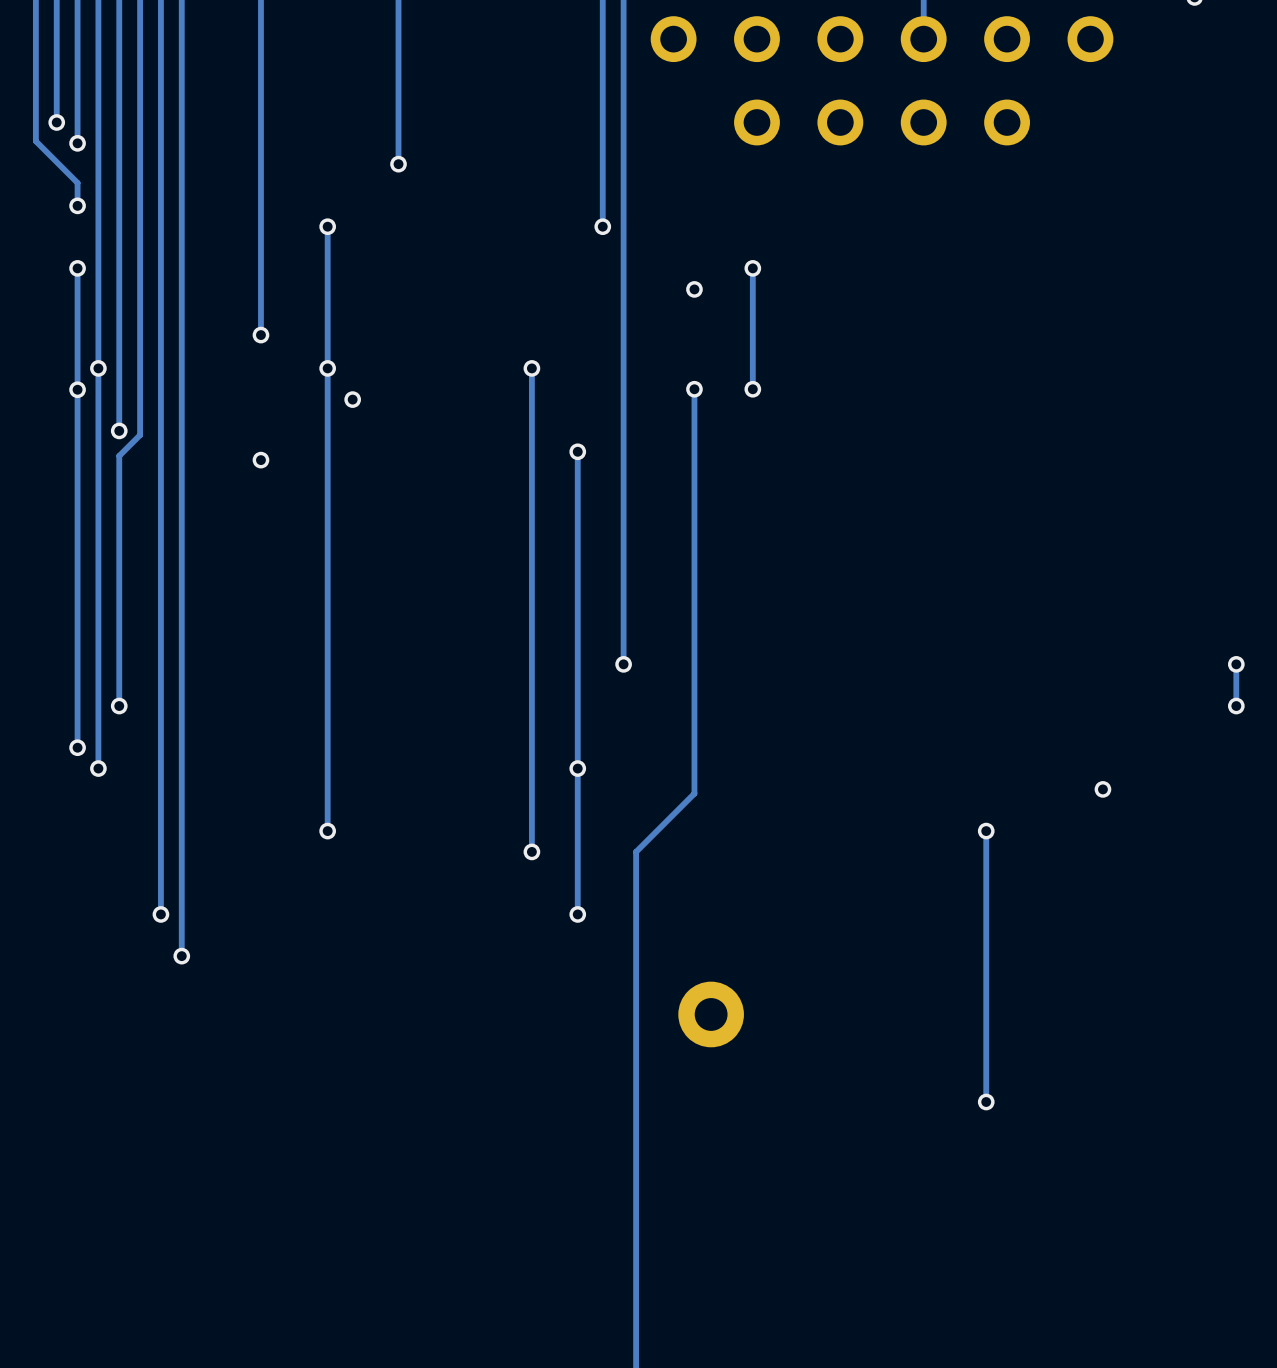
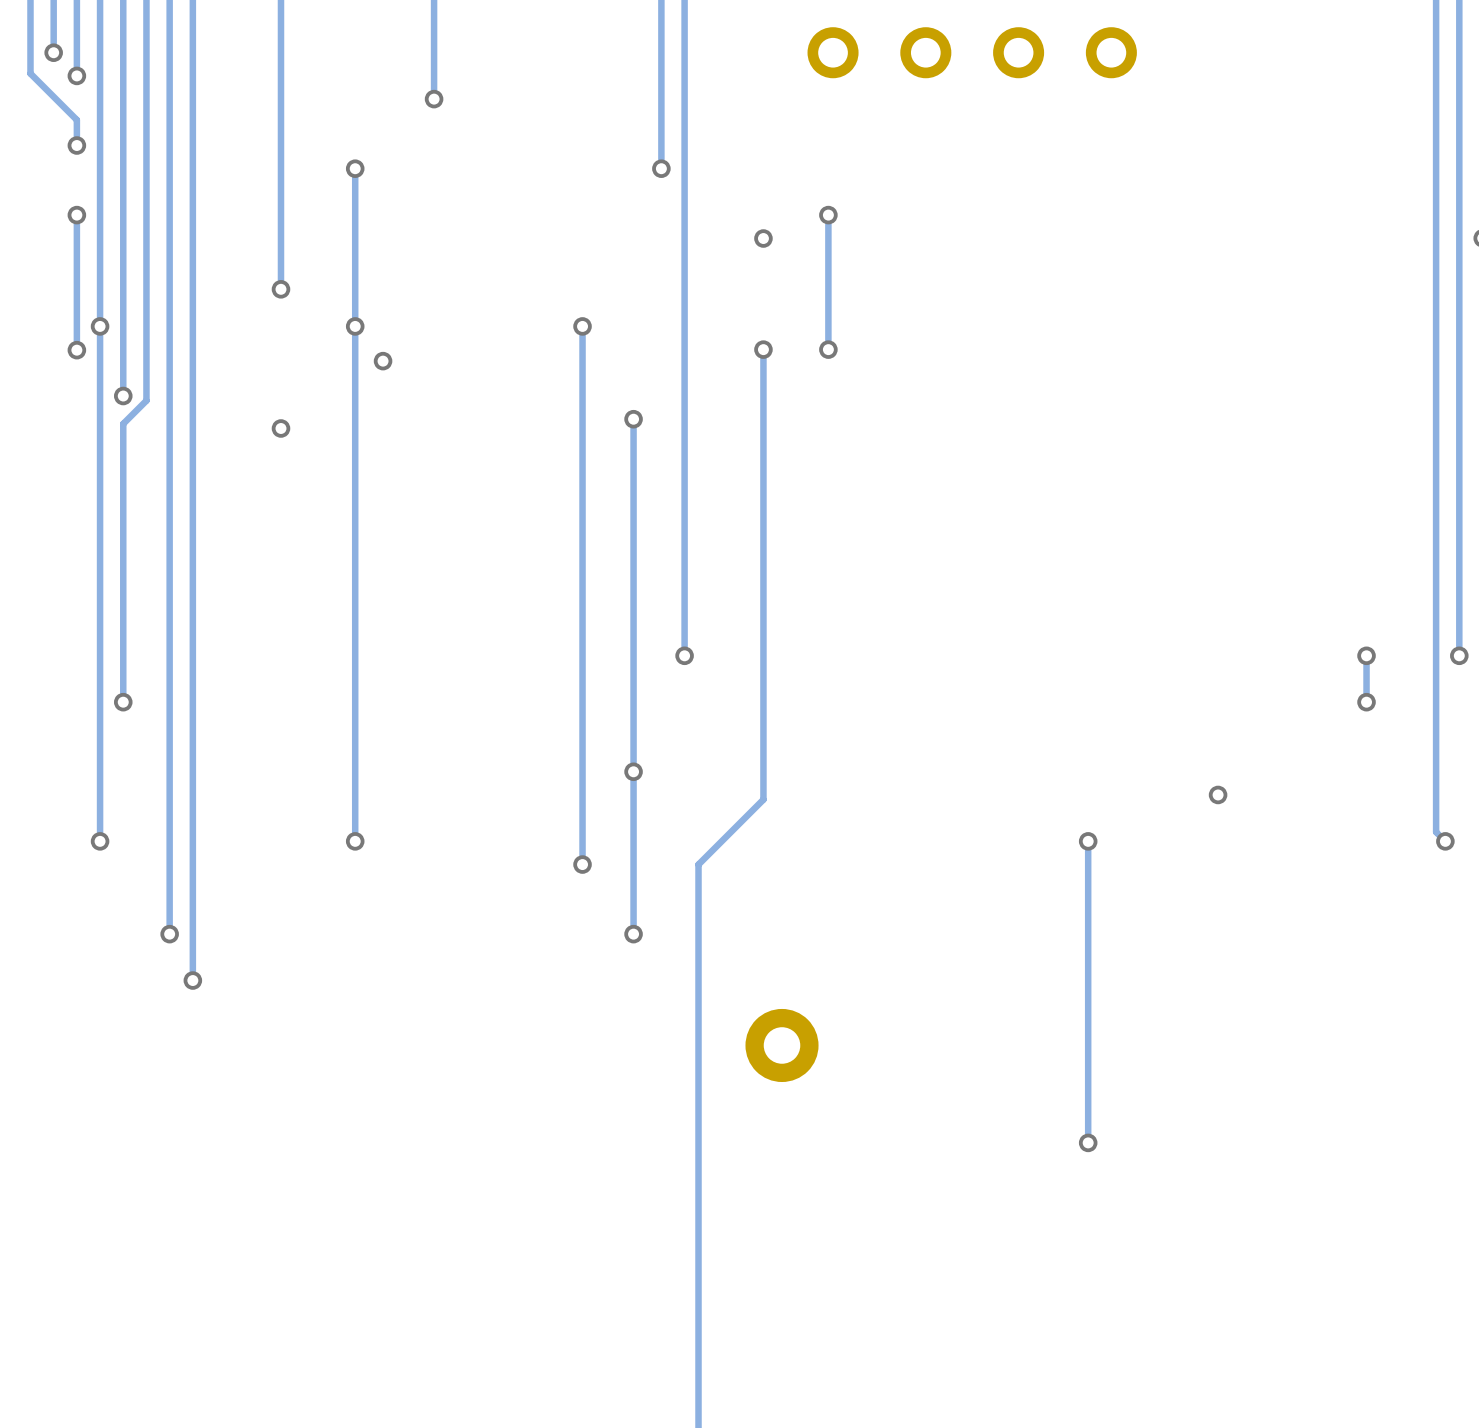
track: (77, 389) (77, 747) -> none
via: (77, 747) -> none
track: none -> (100, 771) (100, 841)
via: (98, 768) -> none
via: none -> (100, 841)

